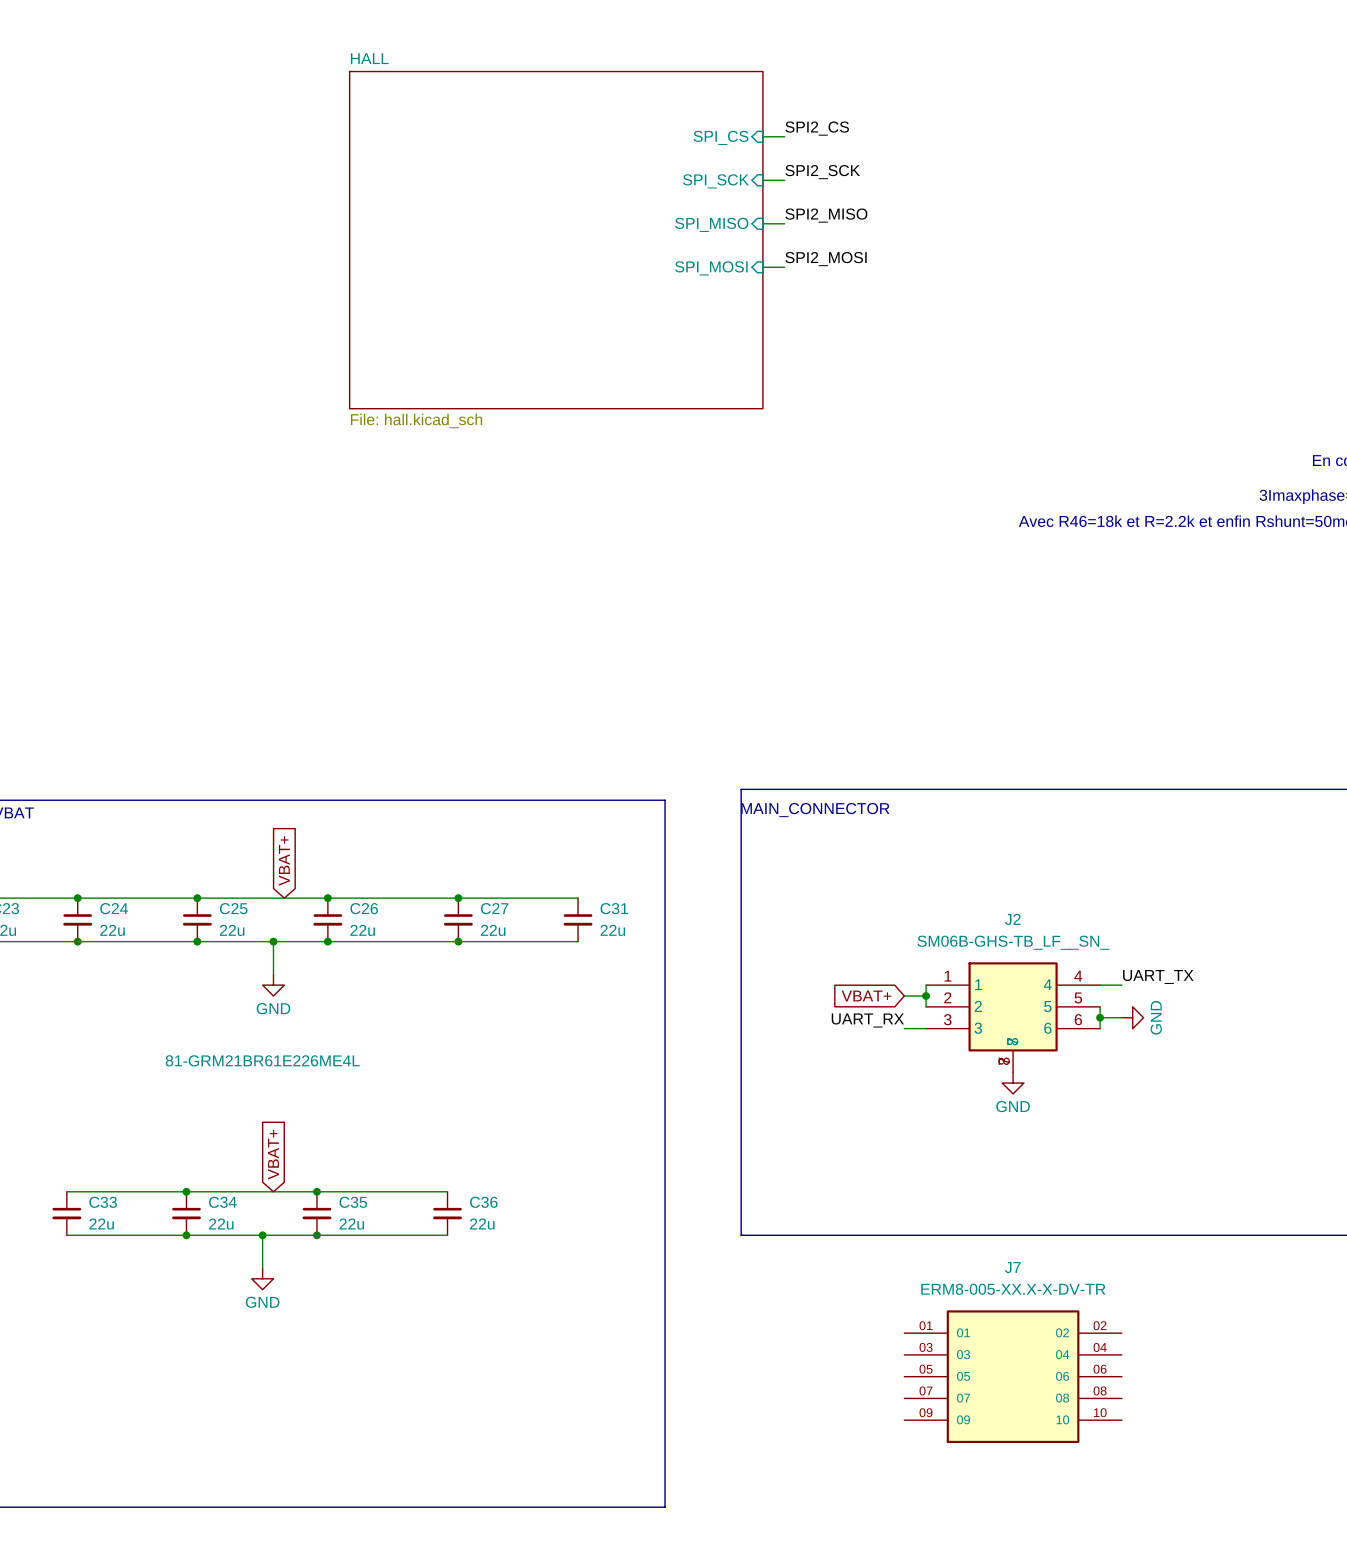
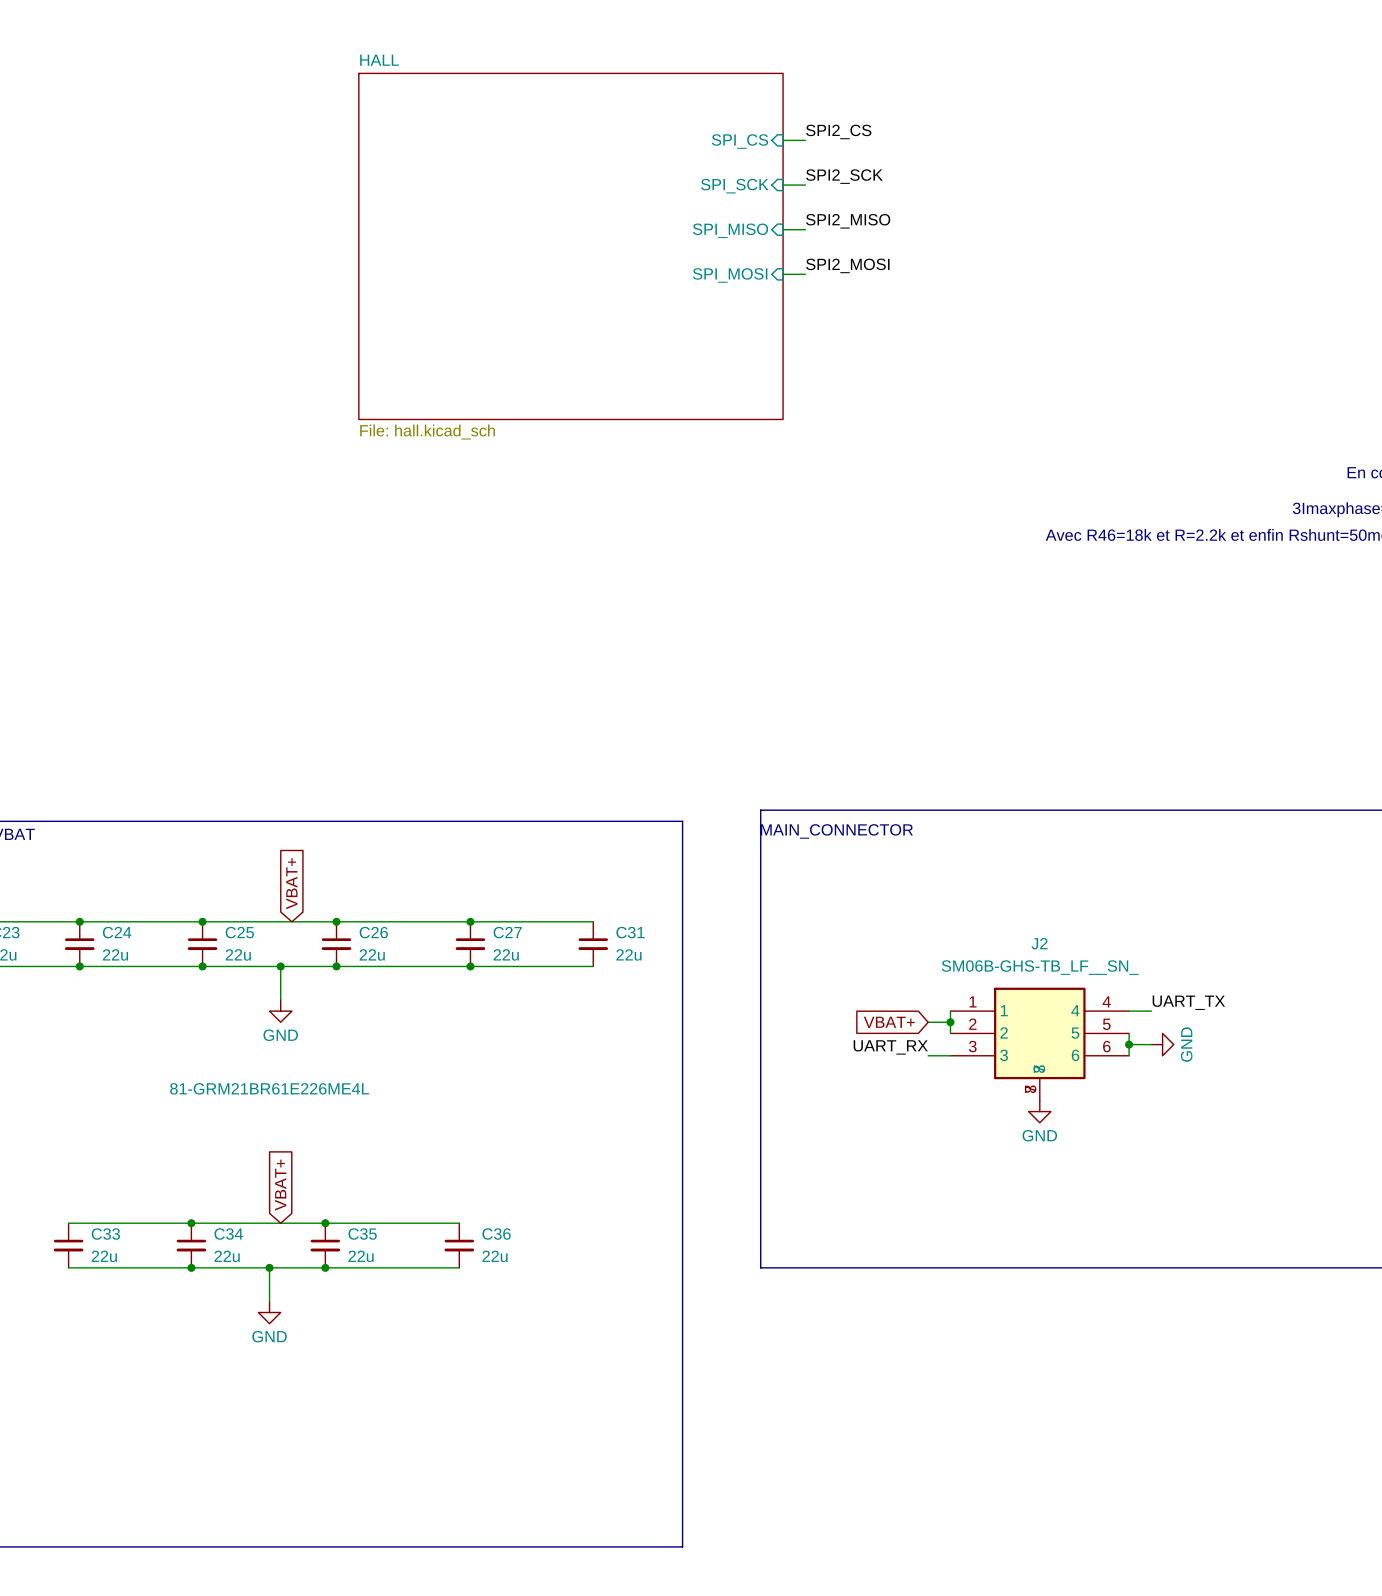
J7: ERM8-005-XX.X-X-DV-TR (1013, 1376) -> none

